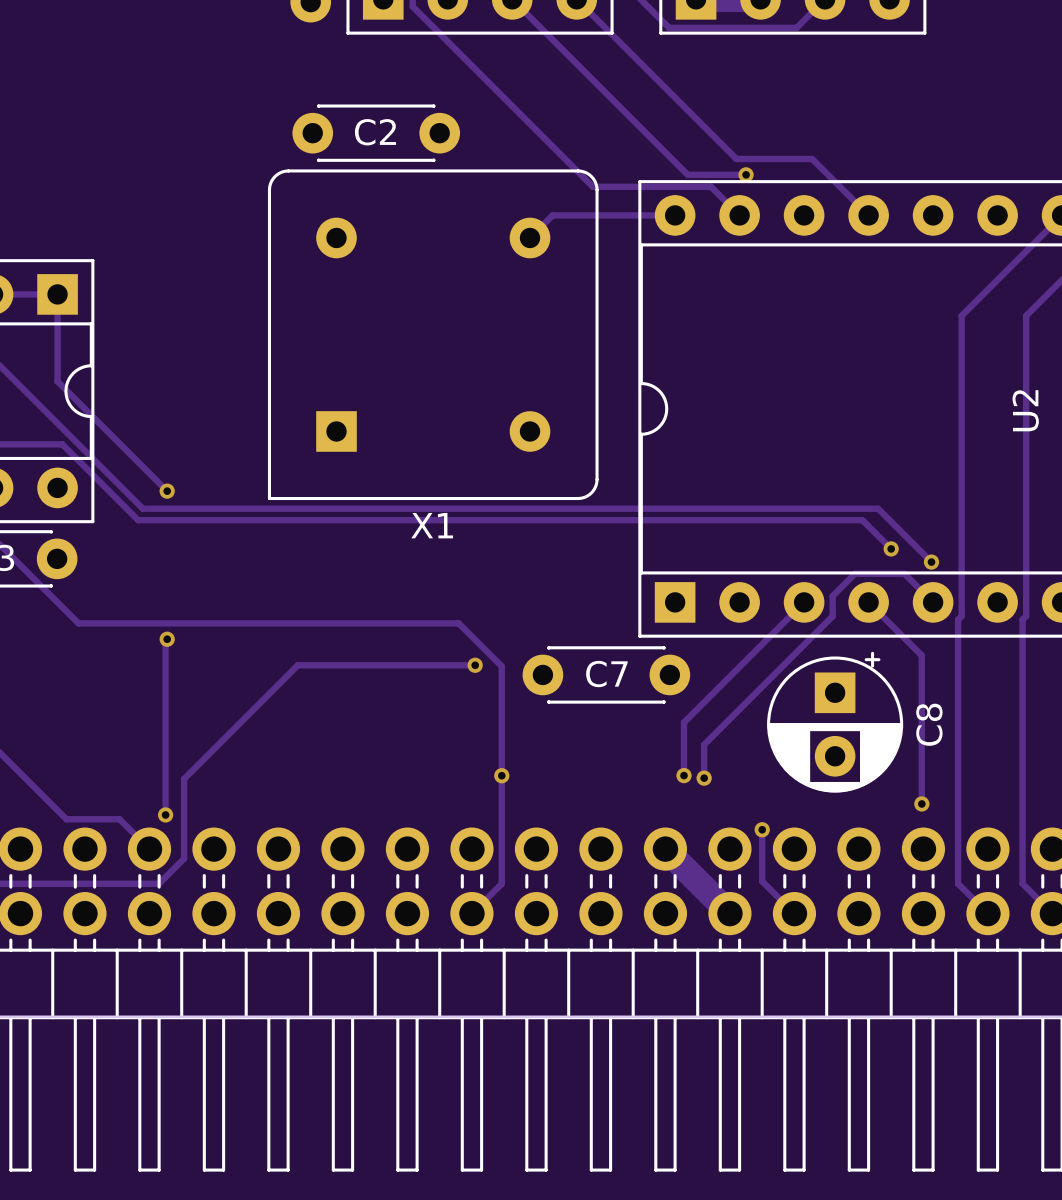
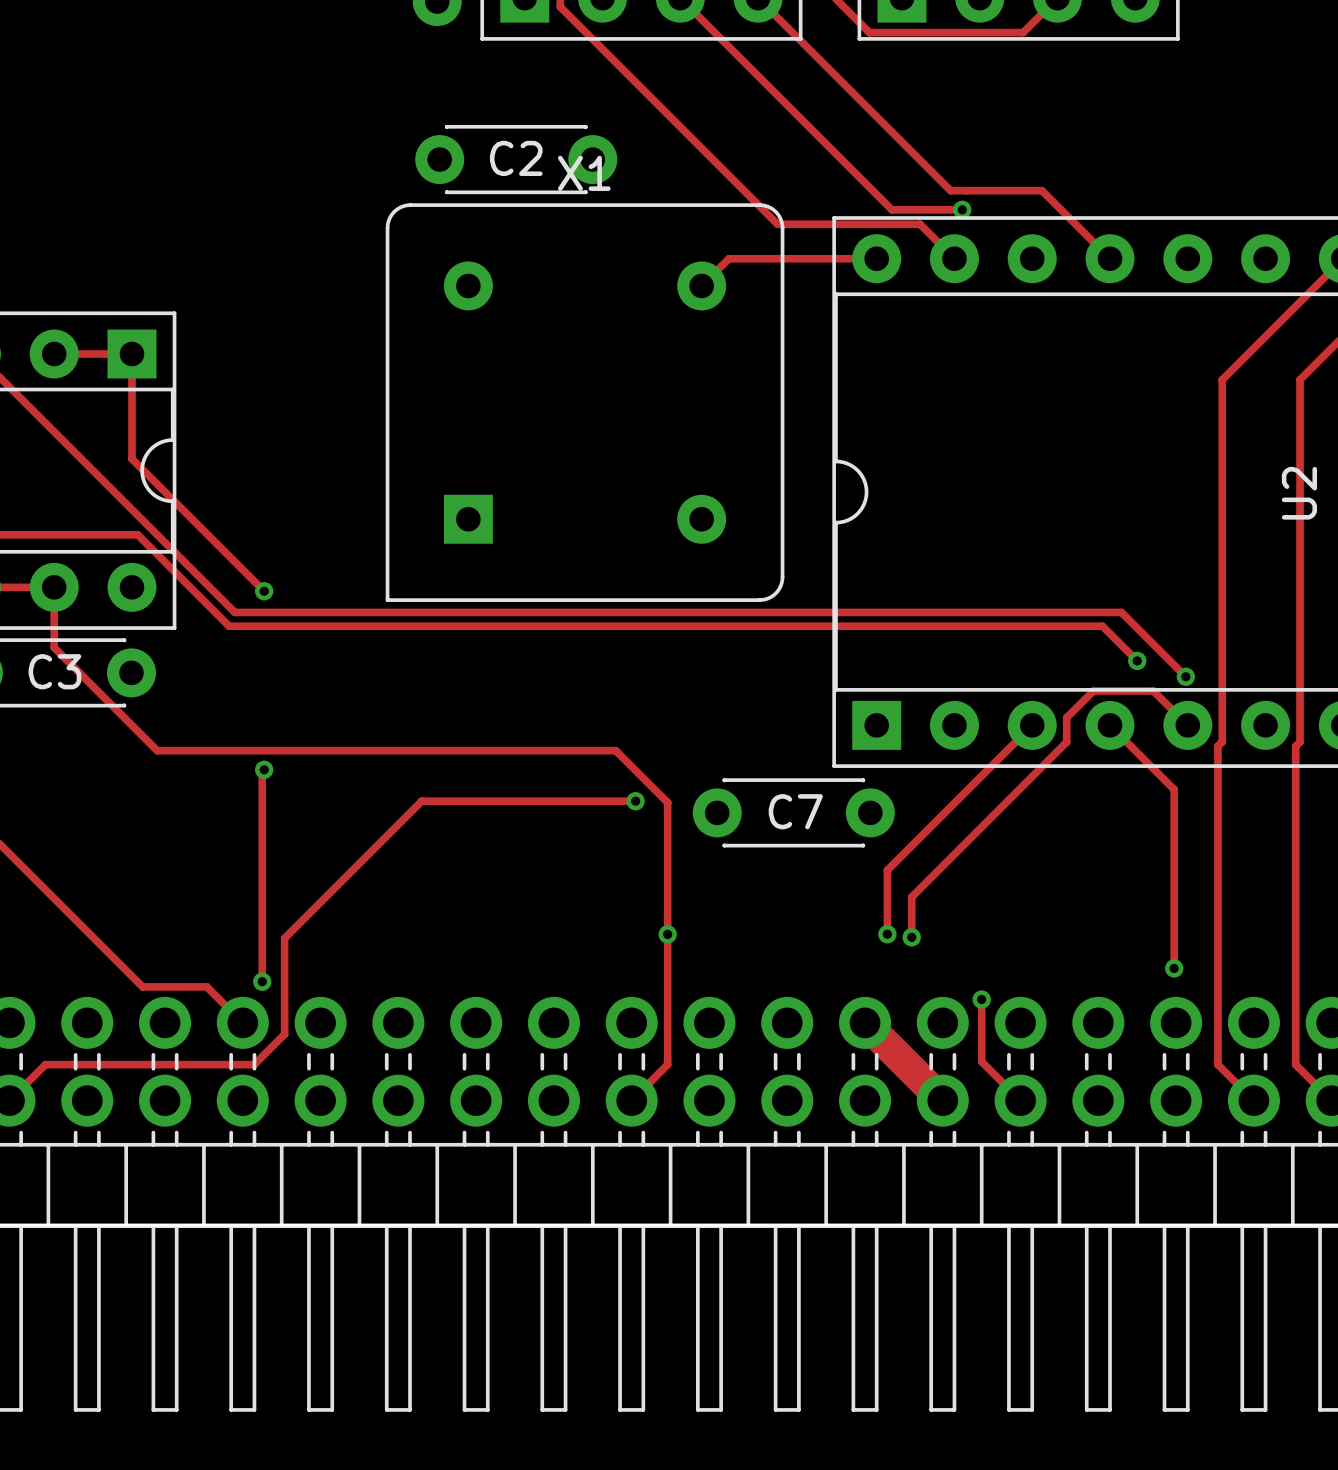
X1 name position: X1 (432, 525) -> X1 (584, 173)
C8: (835, 722) -> none

